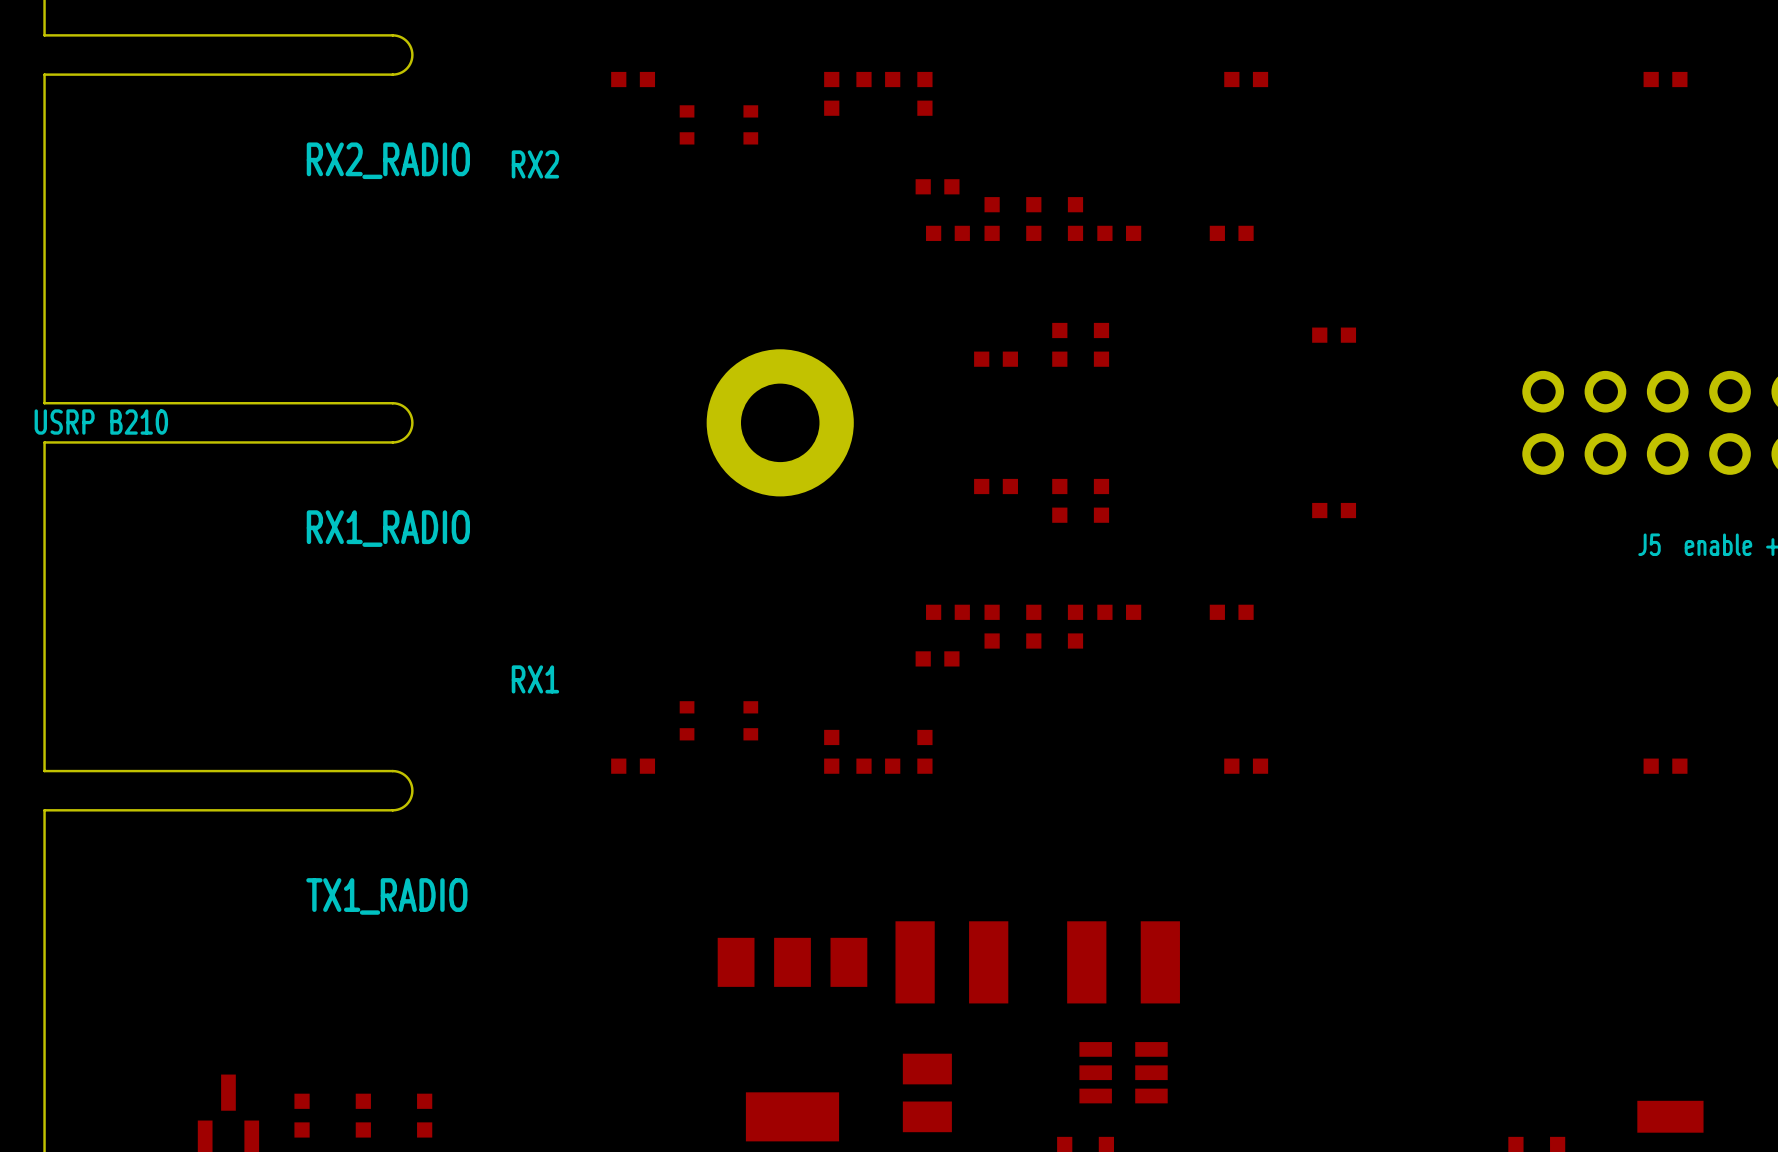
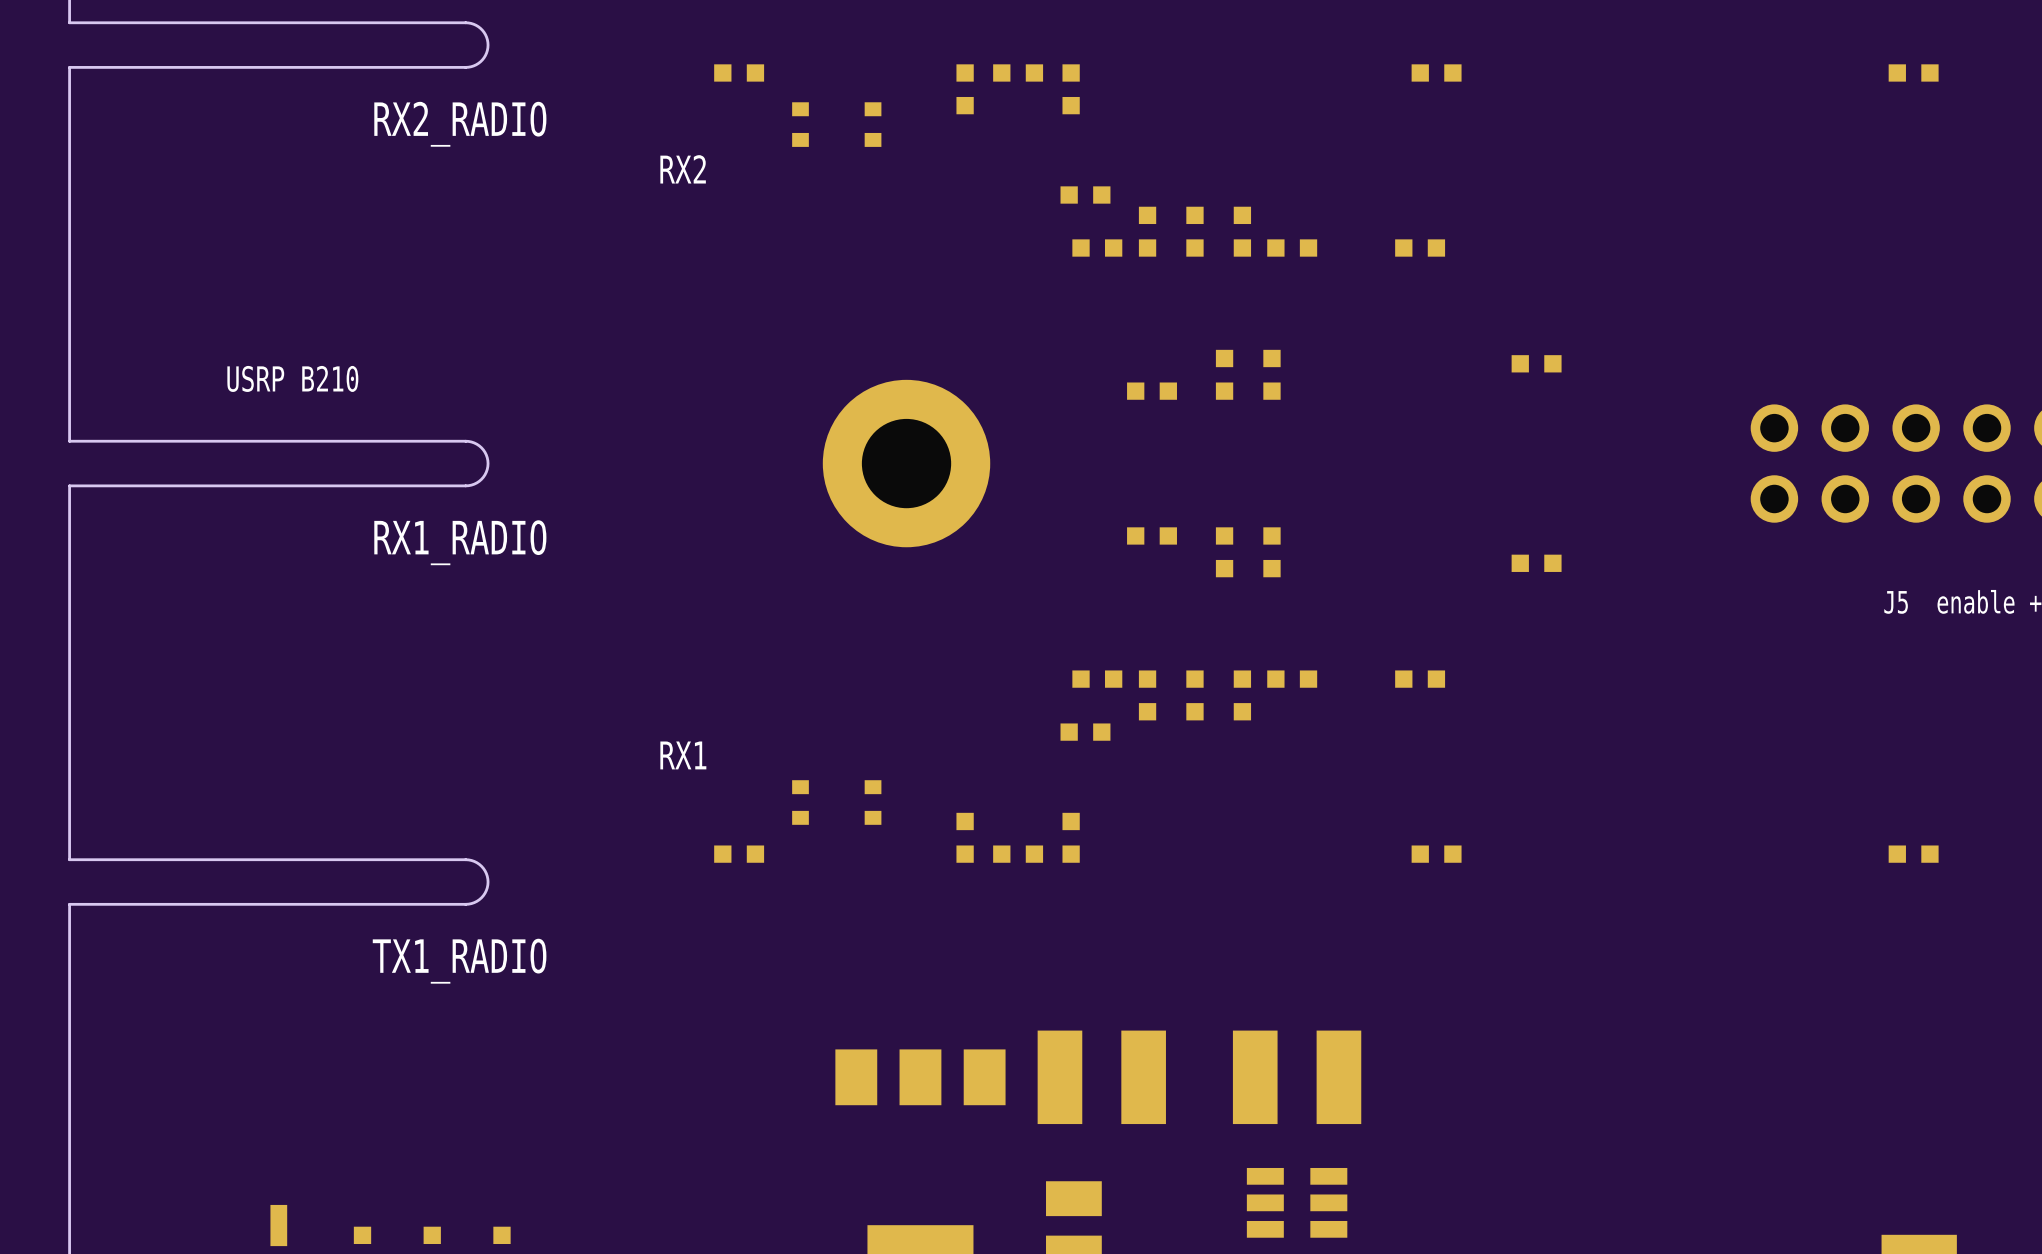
text position: RX2_RADIO (388, 160) -> RX2_RADIO (460, 124)
text position: RX2 (535, 164) -> RX2 (683, 169)
text position: USRP B210 (101, 422) -> USRP B210 (292, 378)
text position: RX1_RADIO (388, 528) -> RX1_RADIO (460, 542)
text position: RX1 (535, 679) -> RX1 (683, 755)
text position: TX1_RADIO (386, 896) -> TX1_RADIO (459, 961)

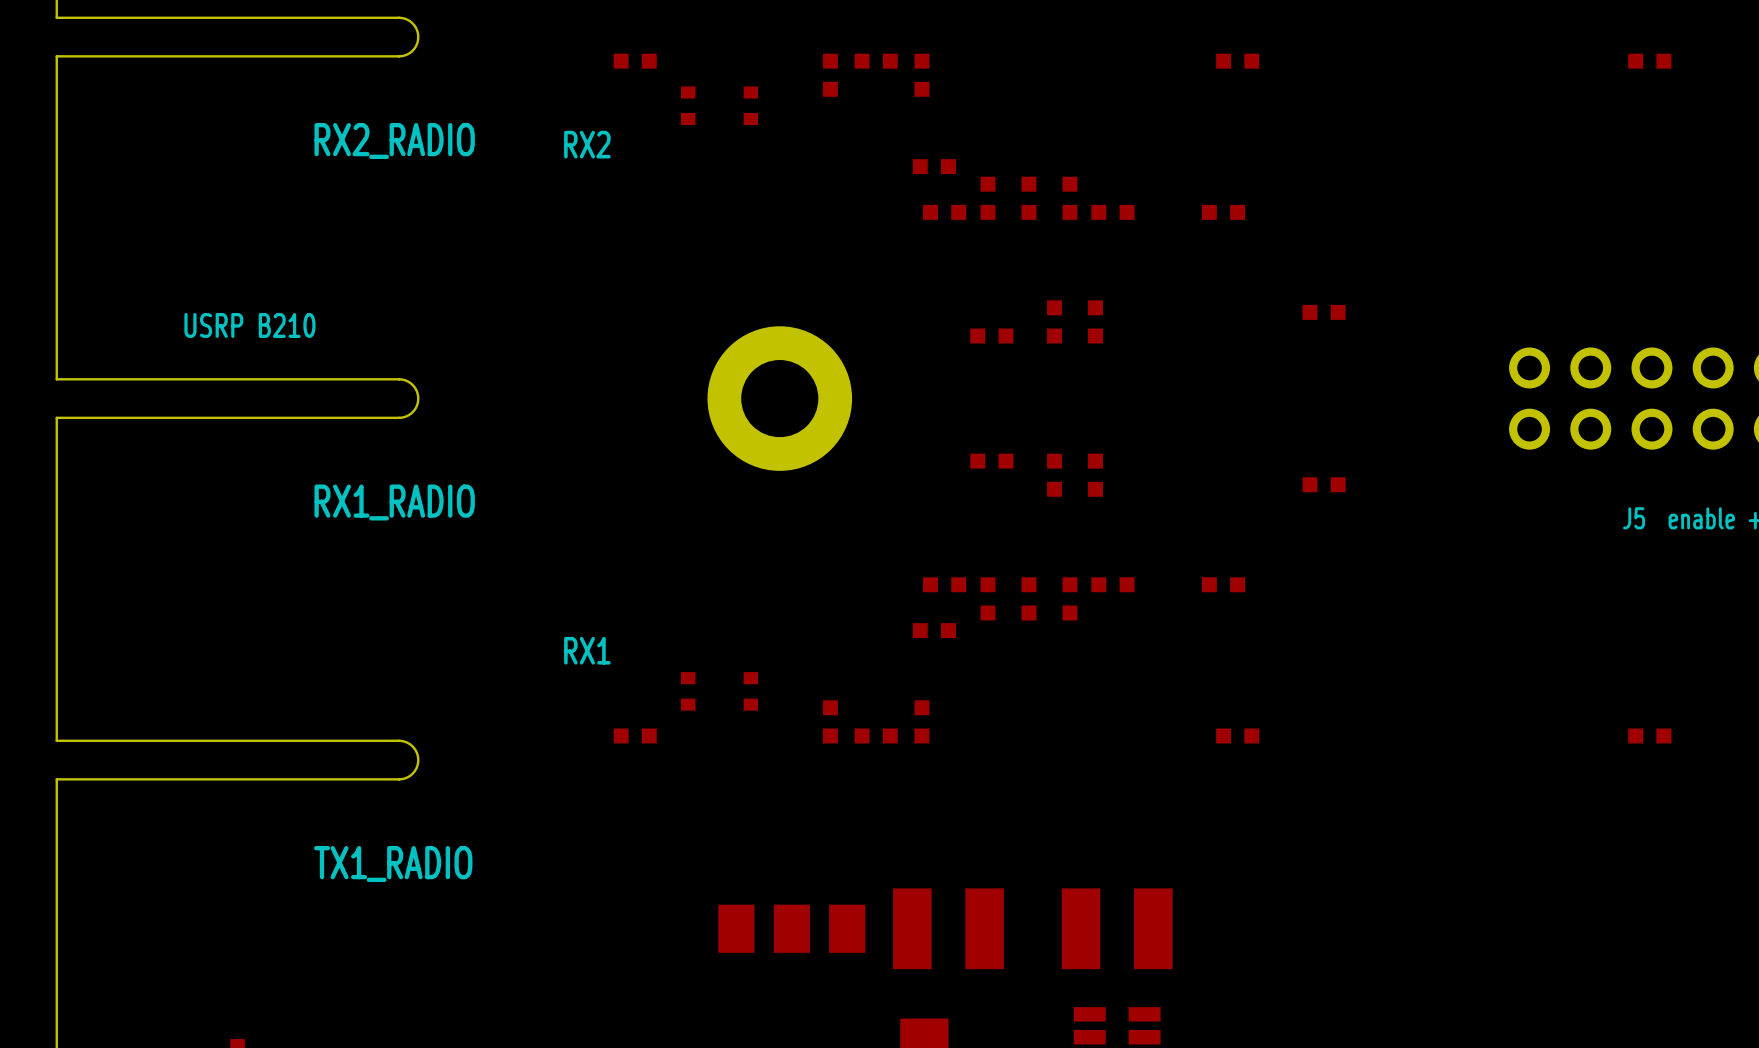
text position: RX2_RADIO (460, 124) -> RX2_RADIO (394, 141)
text position: RX1_RADIO (460, 542) -> RX1_RADIO (394, 502)
text position: TX1_RADIO (459, 961) -> TX1_RADIO (393, 864)

